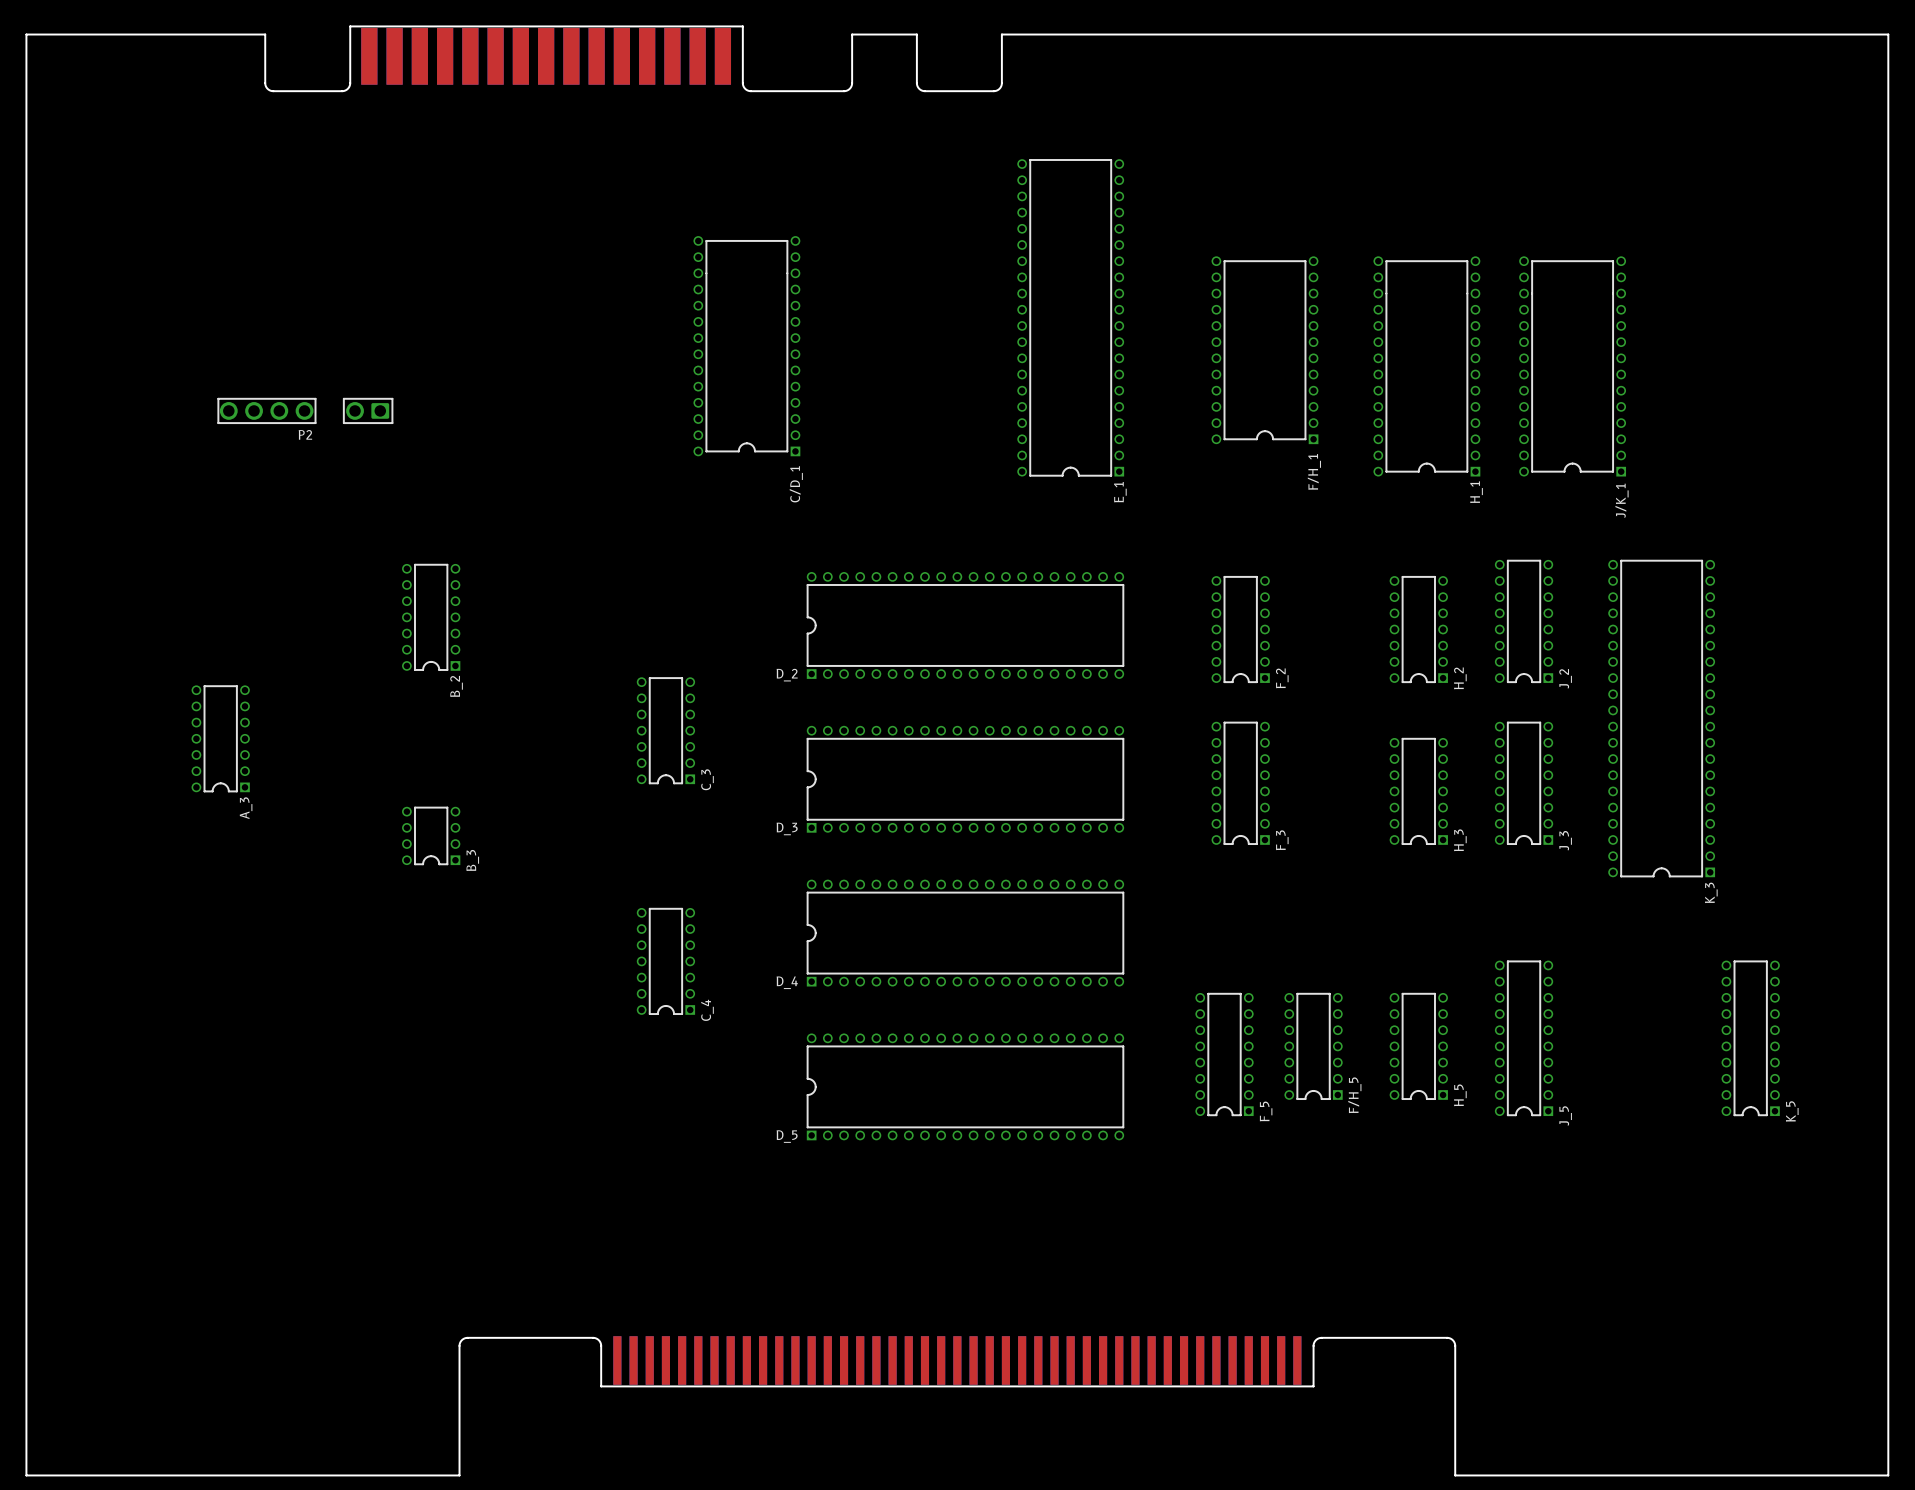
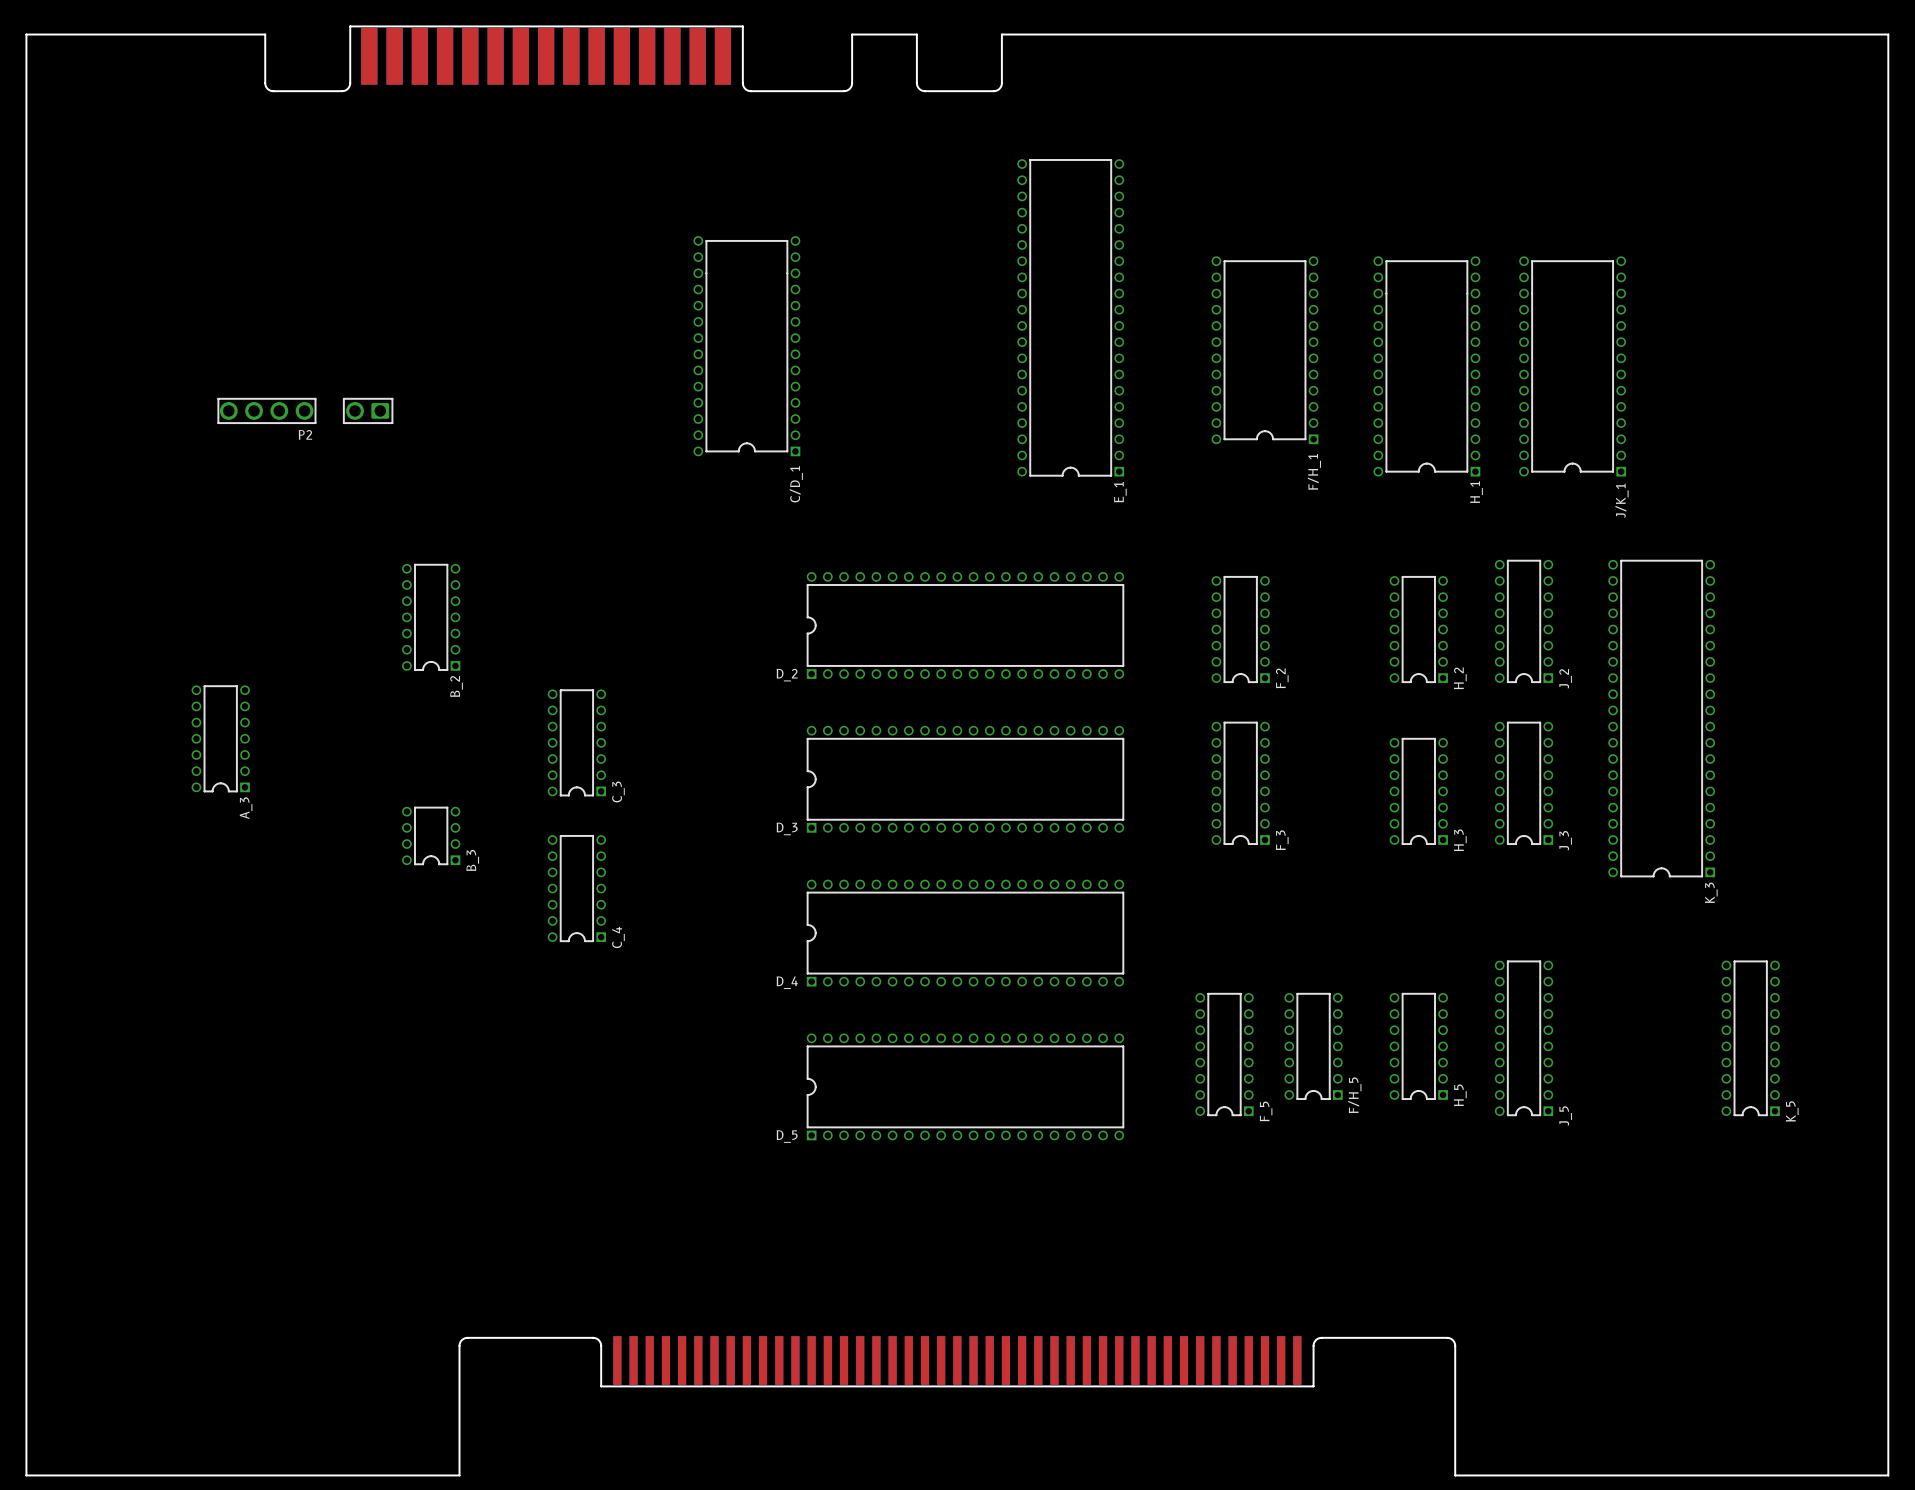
C_3 position: (665, 730) -> (576, 742)
C_4 position: (665, 961) -> (576, 888)

